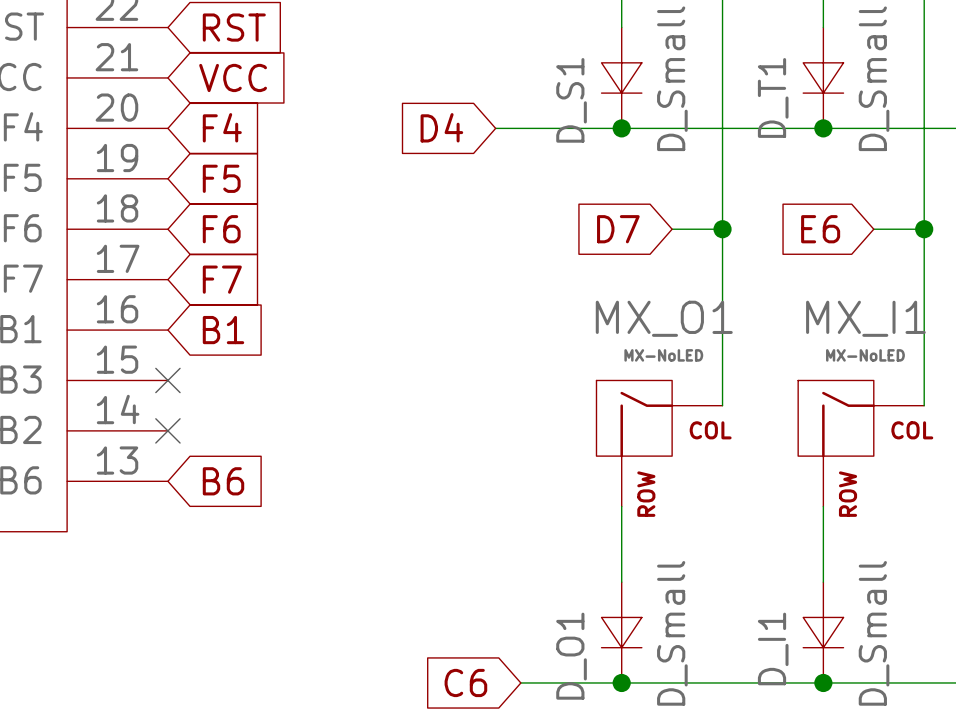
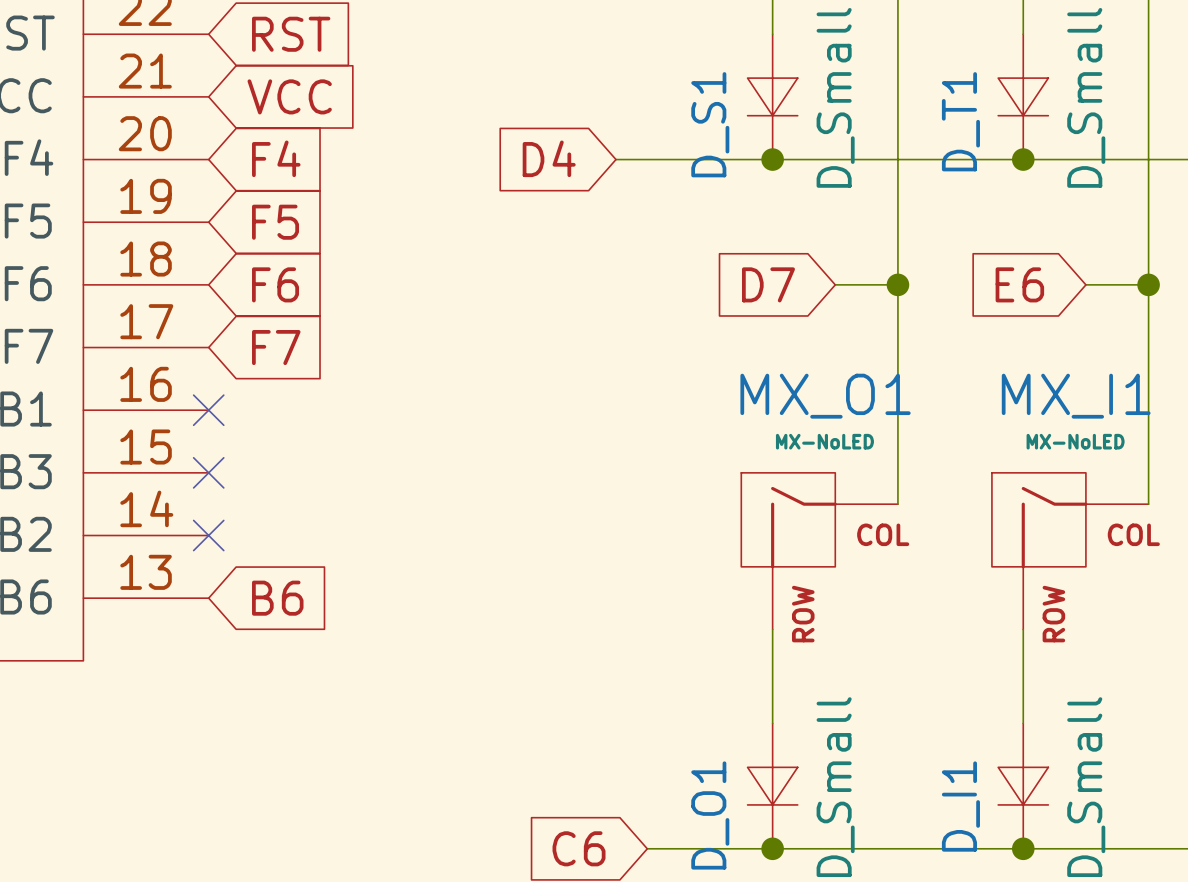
no-connect mark: none -> (208, 410)
global label: B1 (223, 330) -> none

